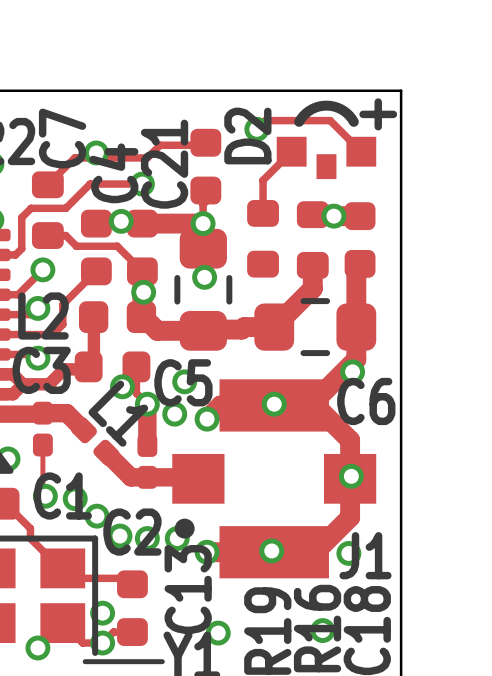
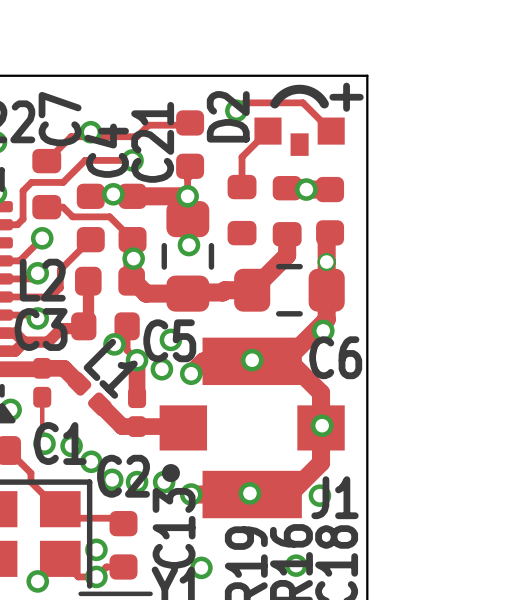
via: none -> (326, 262)

